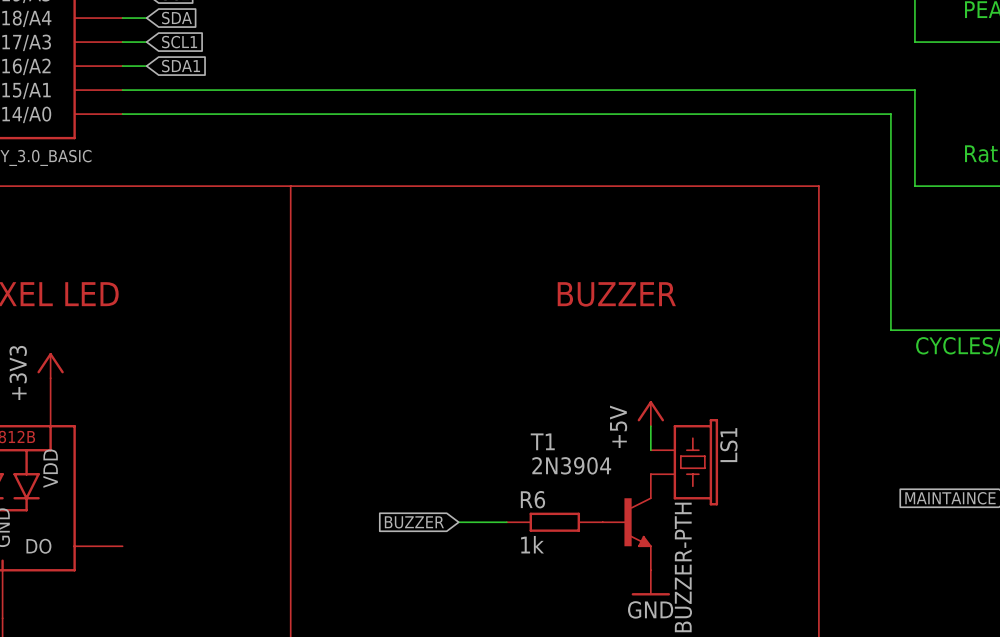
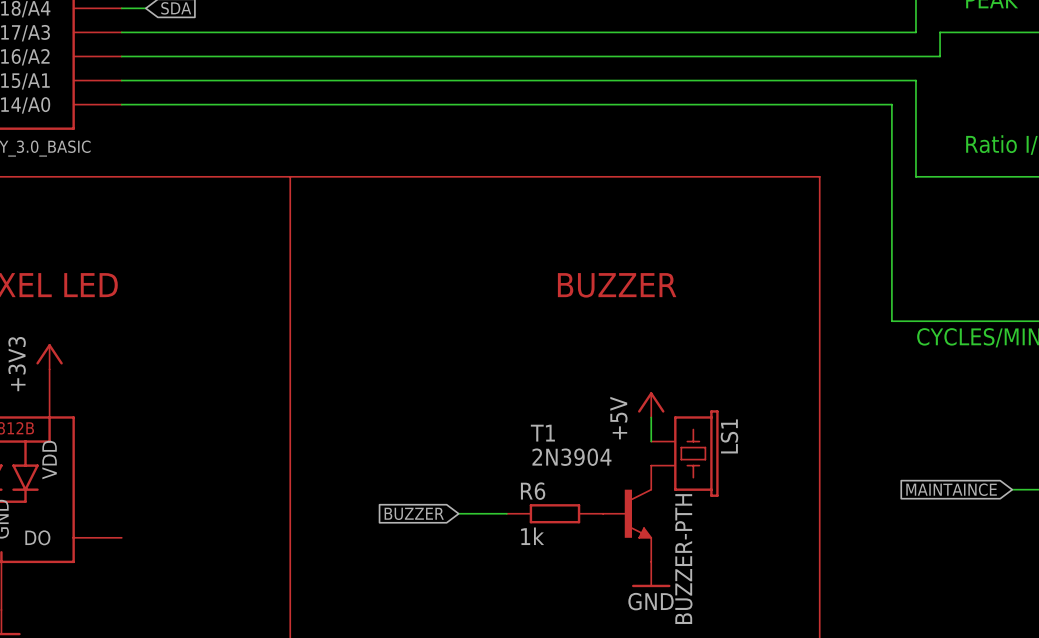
wire: none -> (145, 32) (915, 32)
global label: SCL1 (179, 42) -> none
wire: (914, 42) (938, 42) -> (145, 56) (940, 56) (940, 32)
global label: SDA1 (181, 66) -> none

